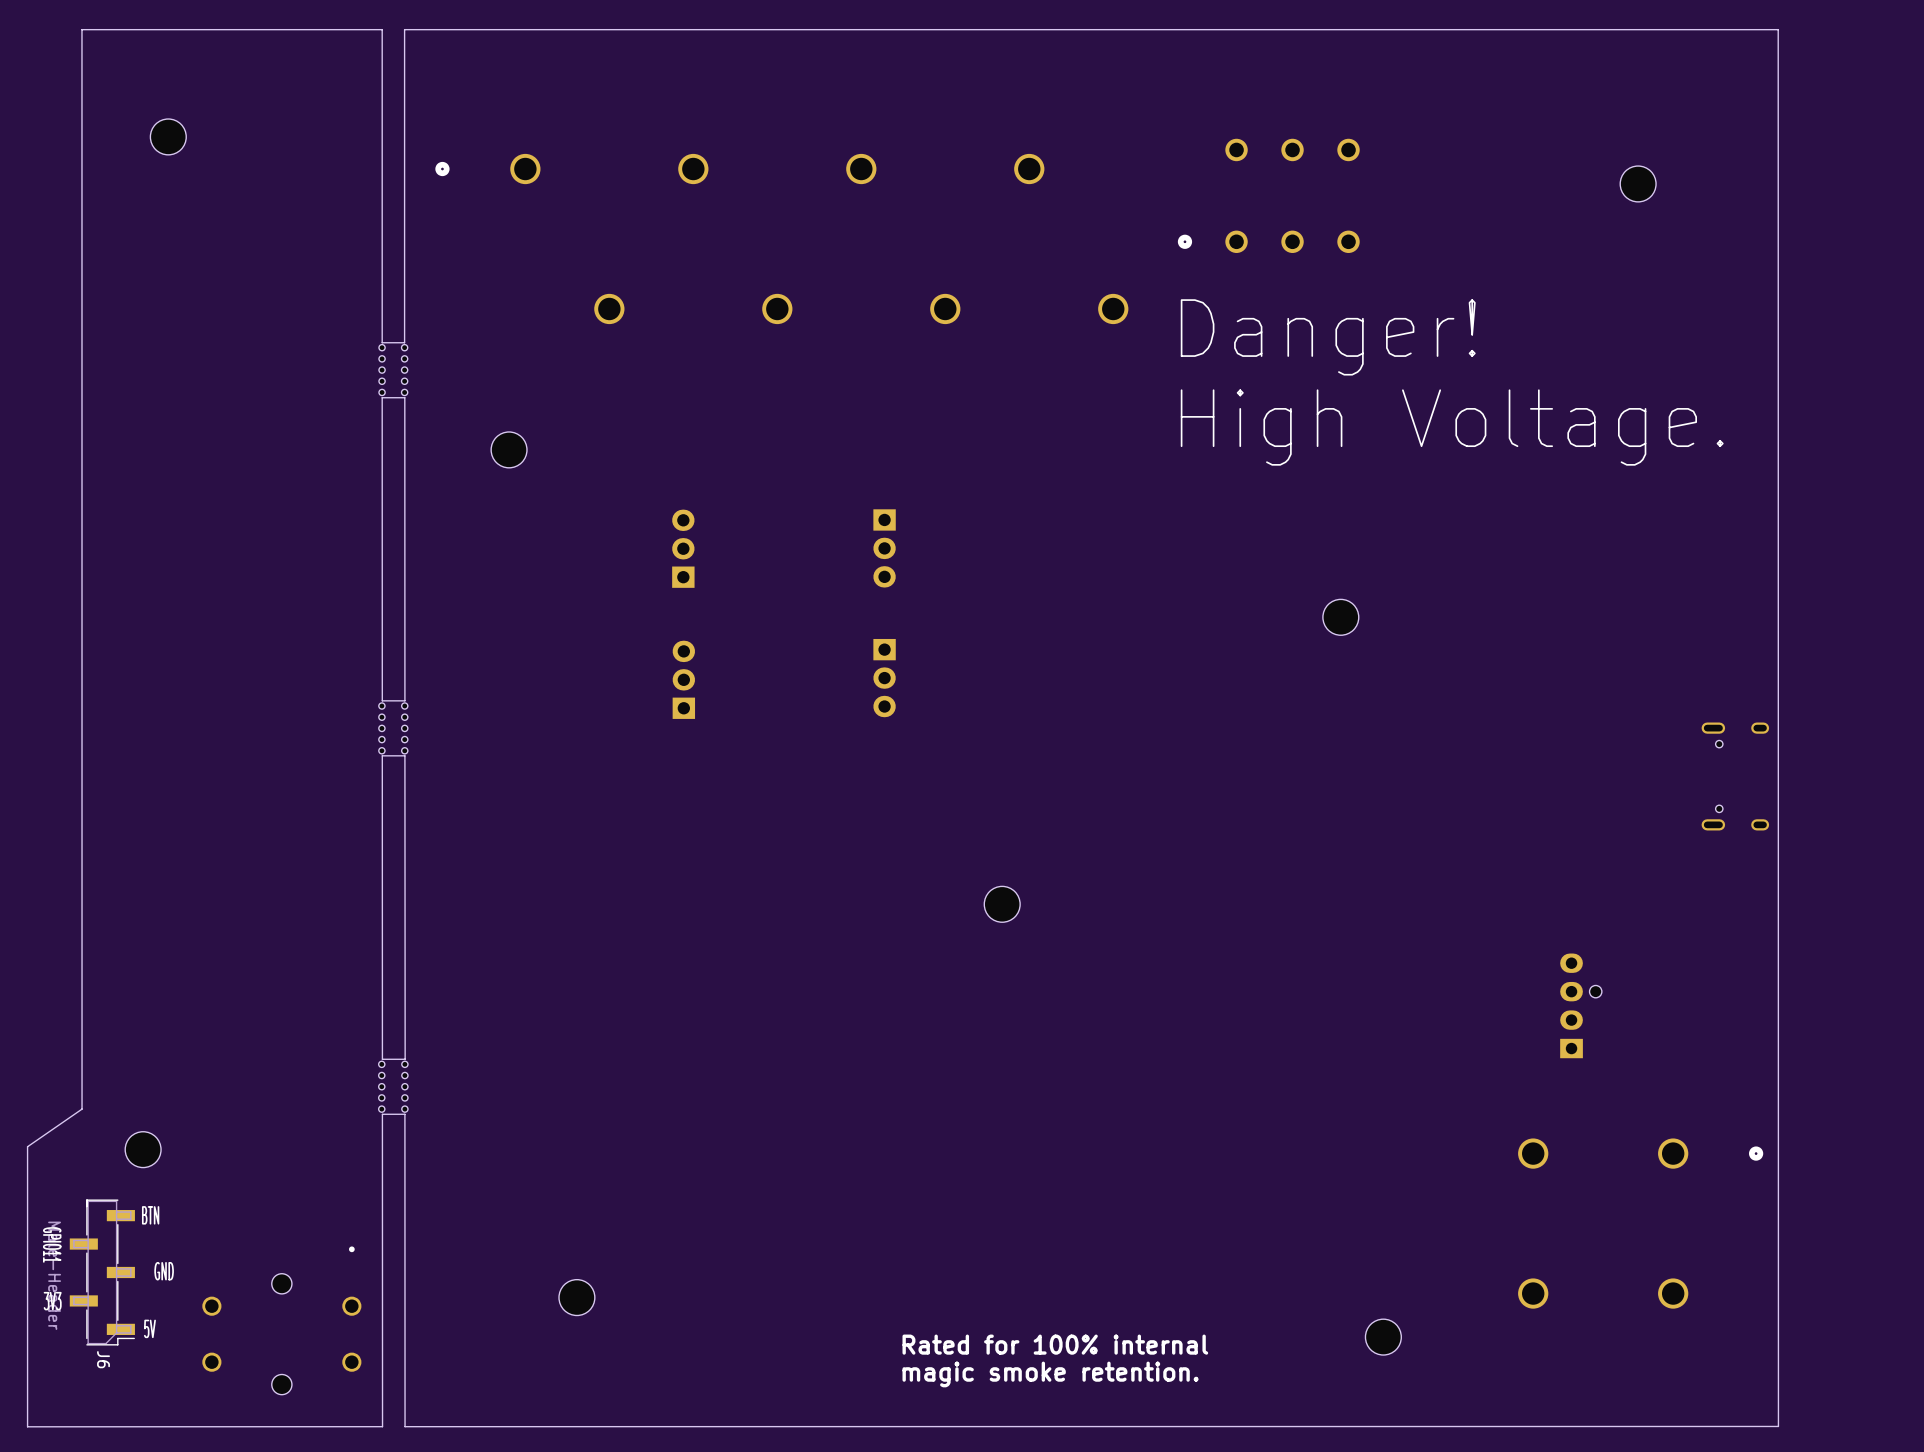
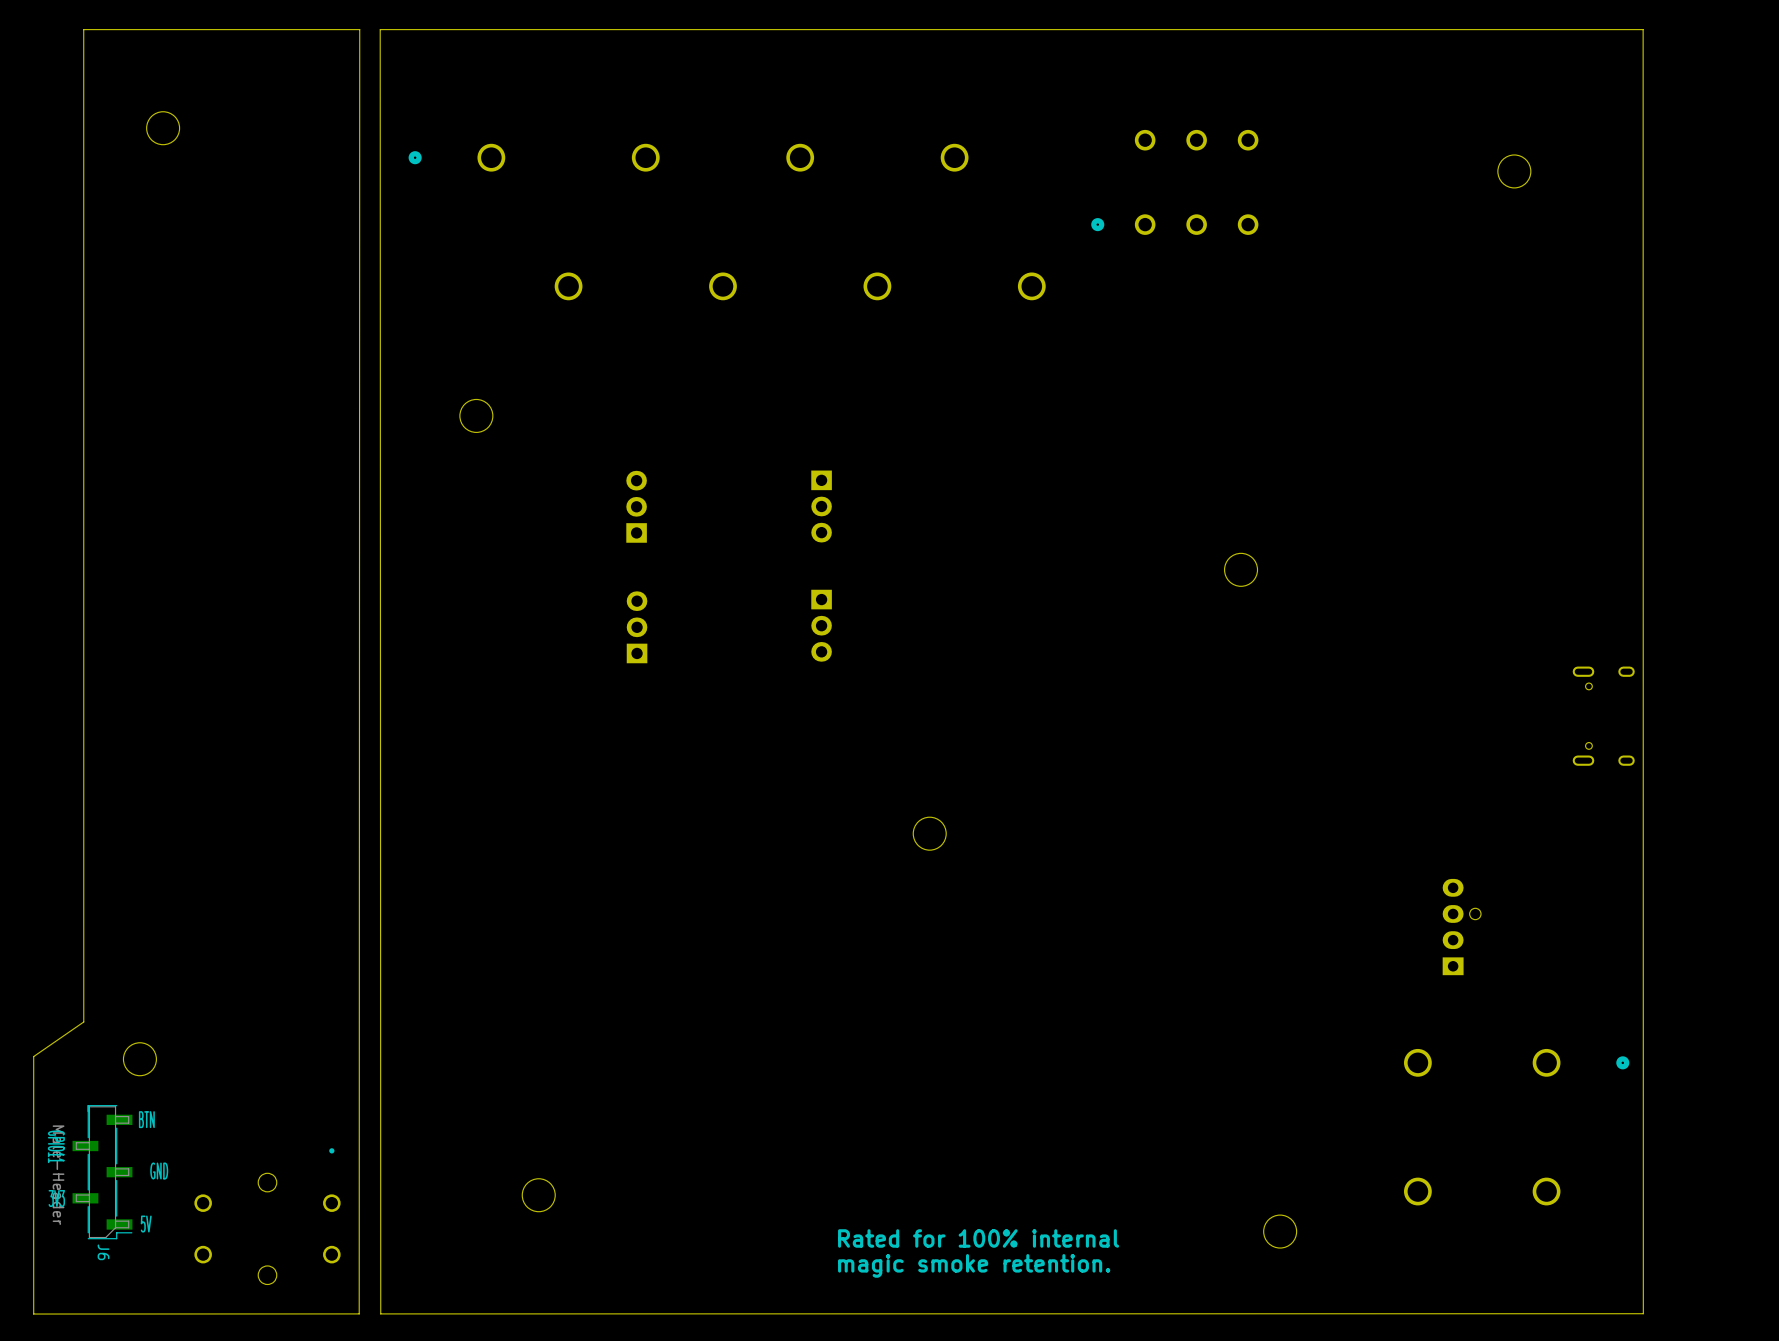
board edge: (404, 29) (404, 342) (382, 342) (382, 29) -> none
text: Danger! (1328, 337) -> none
part: (393, 370) -> none
board edge: (404, 397) (404, 700) (382, 700) (382, 397) (404, 397) -> none
text: High Voltage. (1452, 427) -> none
part: (393, 728) -> none
board edge: (404, 755) (405, 1059) (382, 1059) (382, 755) (404, 755) -> none
part: (393, 1086) -> none
board edge: (382, 1114) (381, 1426) -> (359, 29) (359, 1313)
board edge: (404, 1114) (382, 1114) -> (380, 1026) (380, 29)

